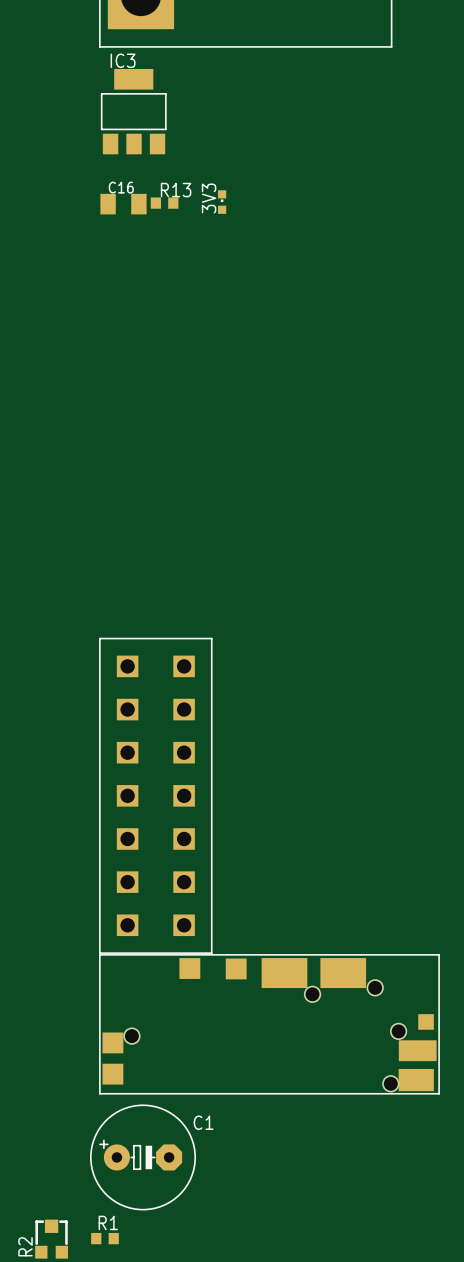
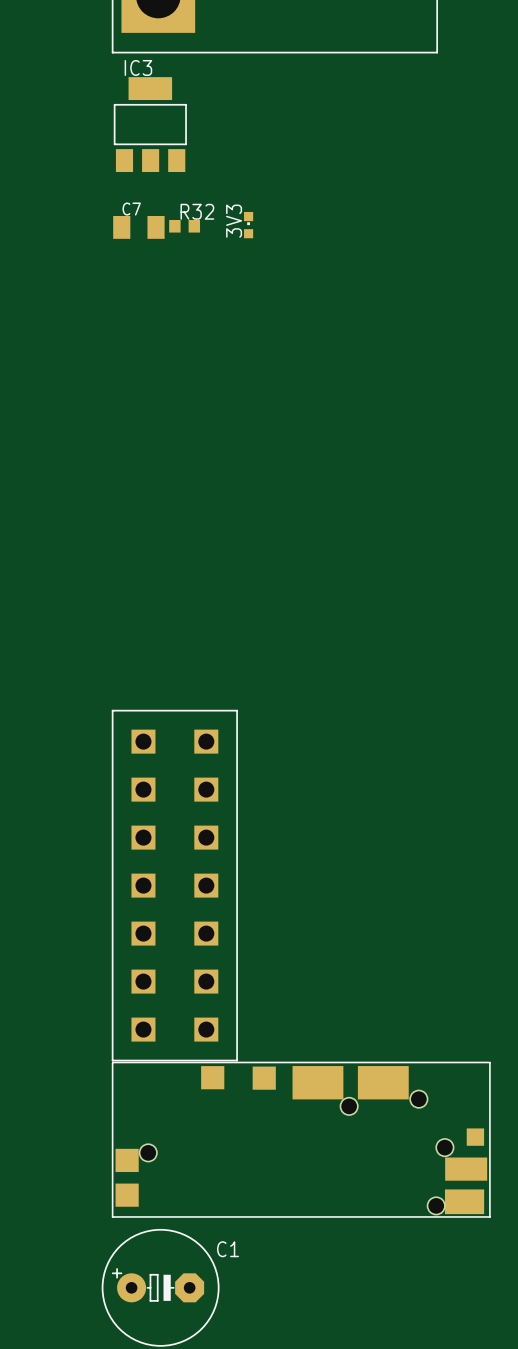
C16 name: C16 (121, 187) -> C7 (131, 209)
R13 name: R13 (176, 190) -> R32 (197, 211)

